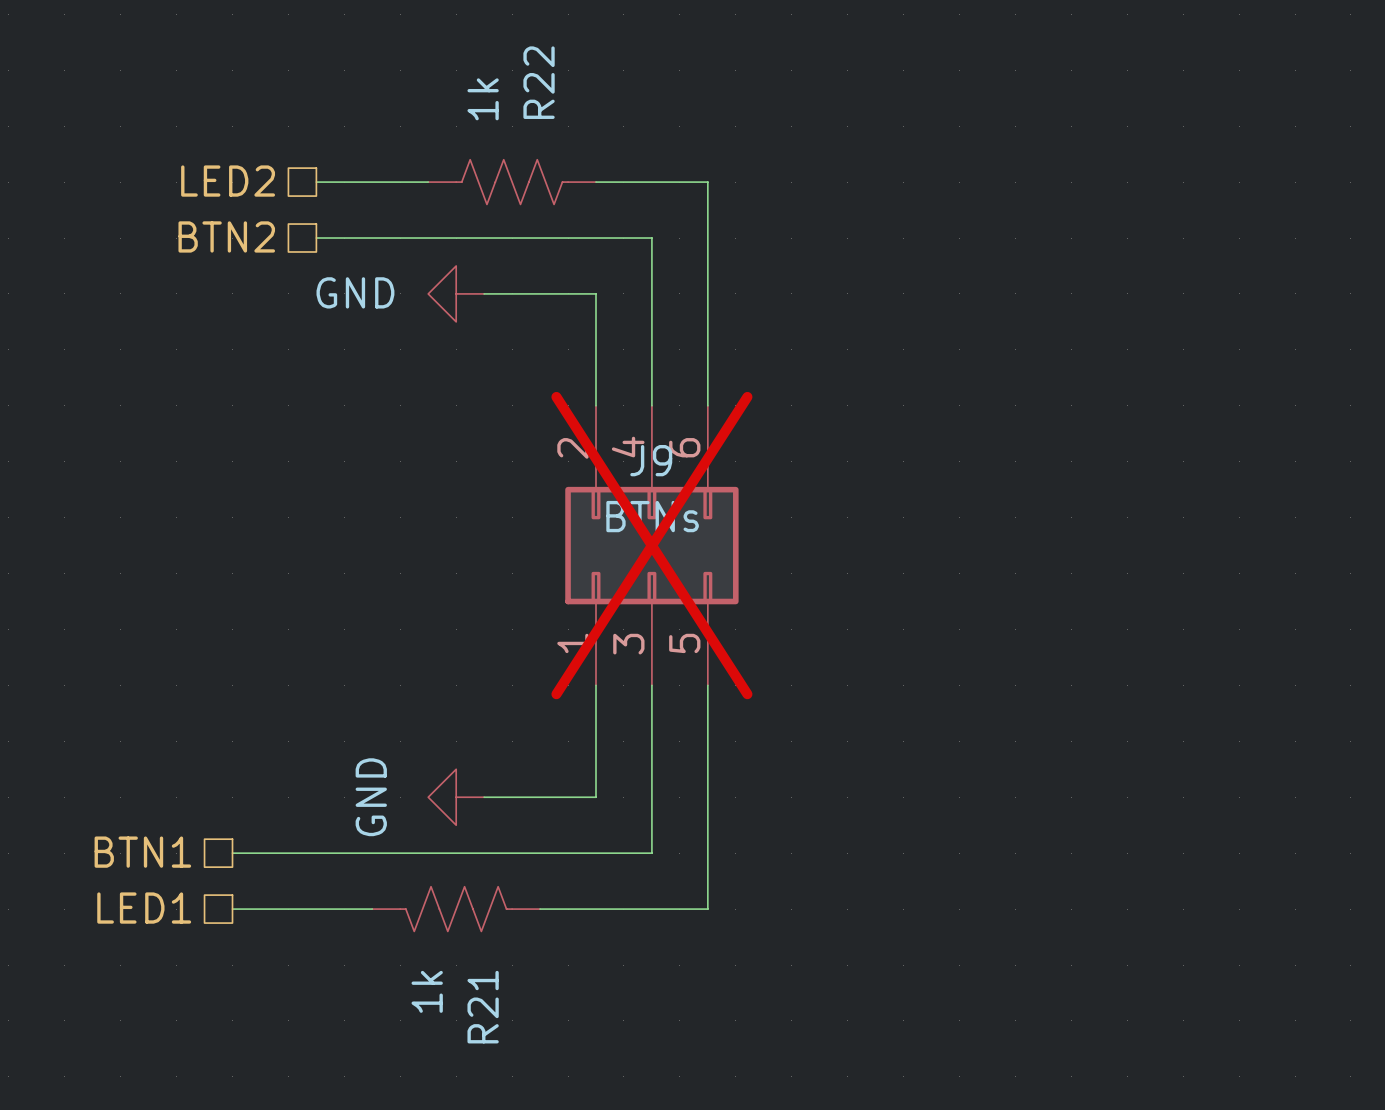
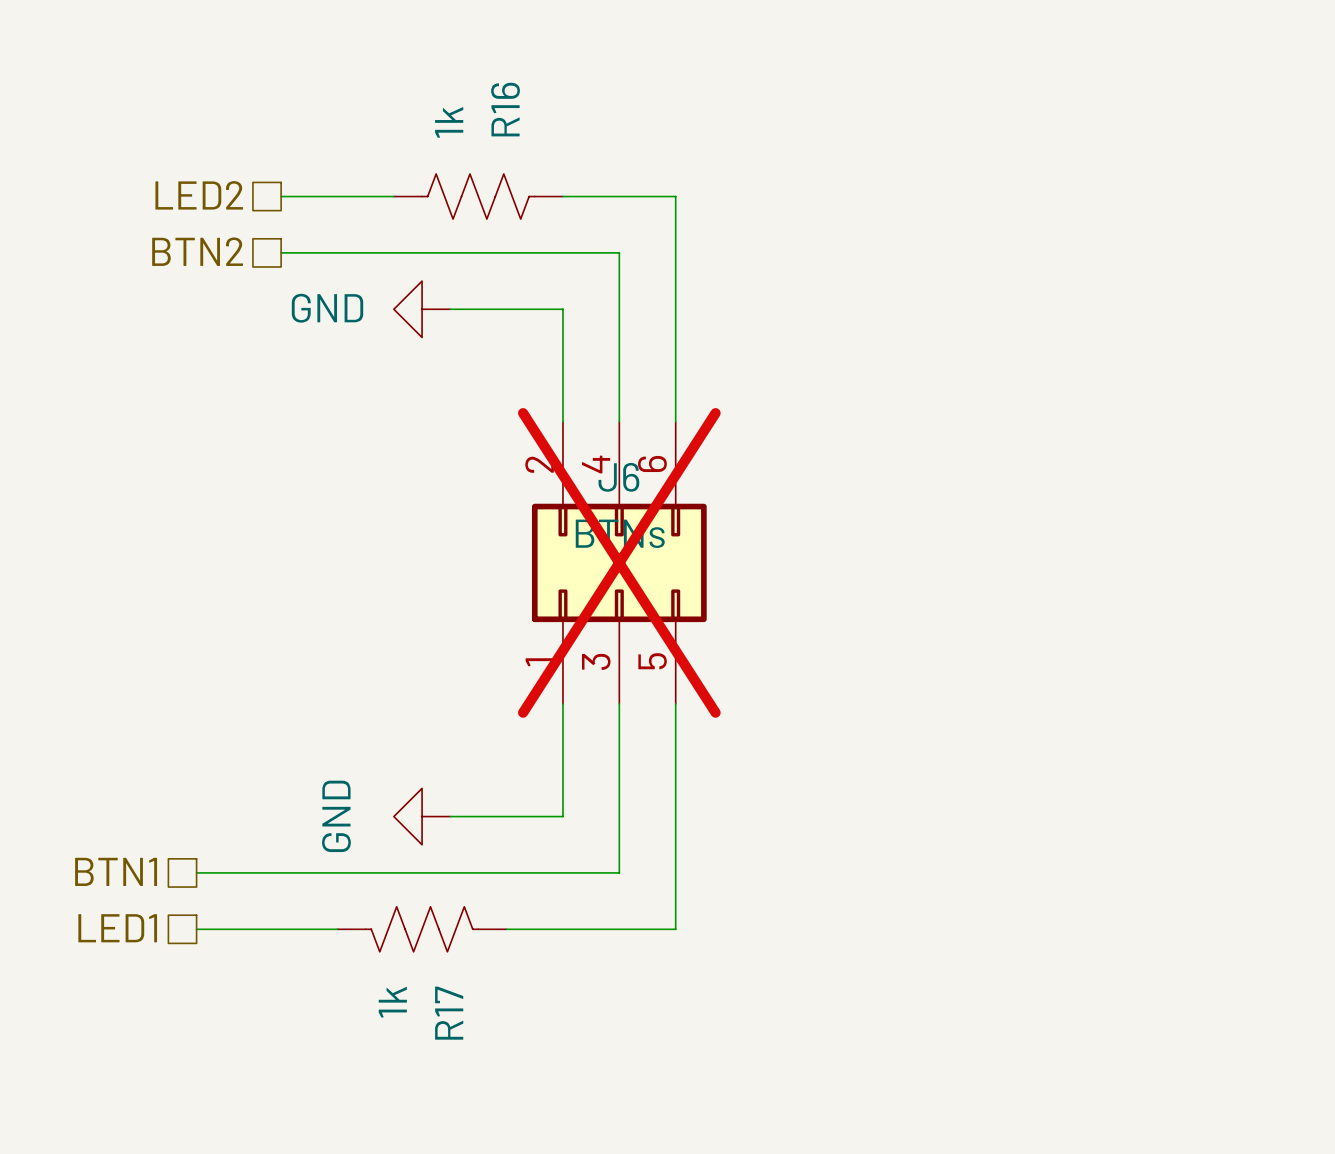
R22 name: R22 (539, 82) -> R16 (505, 109)
J9 name: J9 (651, 460) -> J6 (618, 477)
R21 name: R21 (483, 1007) -> R17 (449, 1013)

